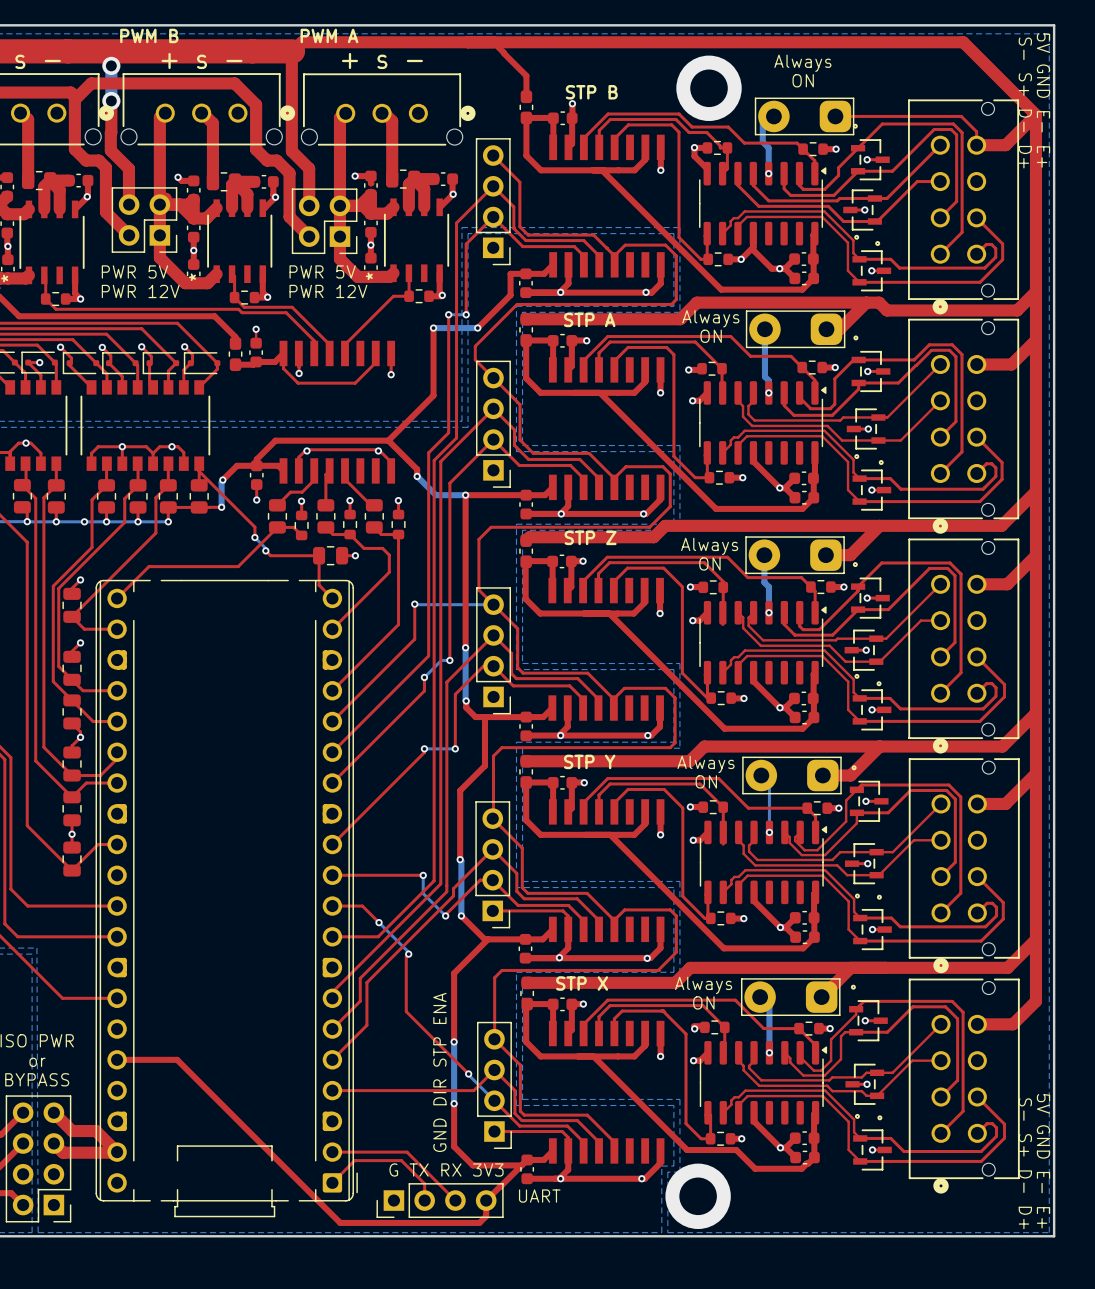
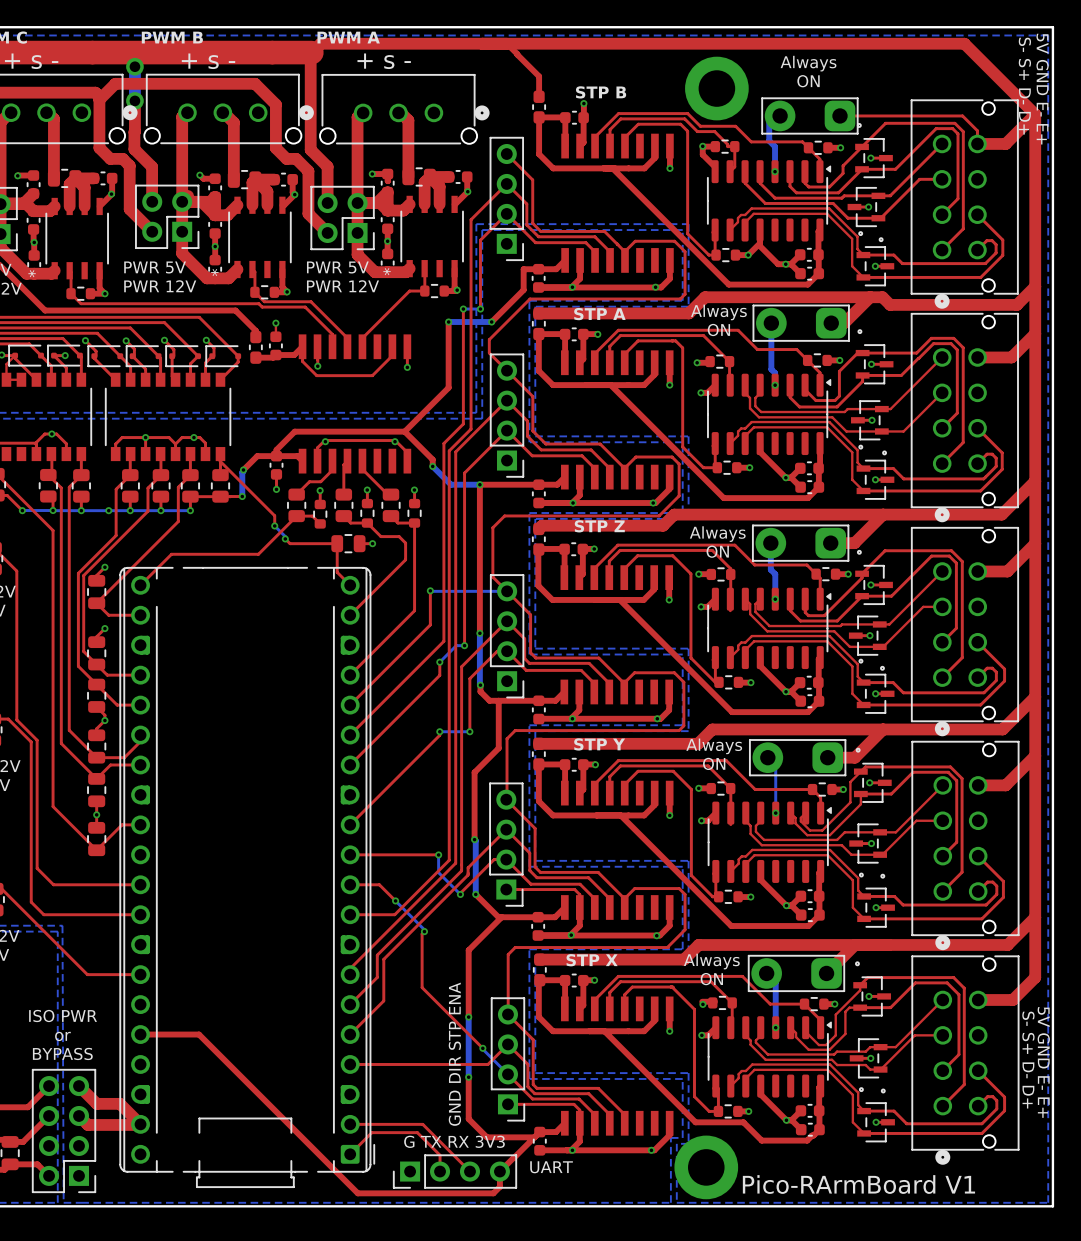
text position: 5V GND E- E+ (1043, 1161) -> 5V GND E- E+ (1043, 1062)
text position: S- S+ D- D+ (1025, 1163) -> S- S+ D- D+ (1028, 1060)
text: none -> Pico-RArmBoard V1 (858, 1184)

